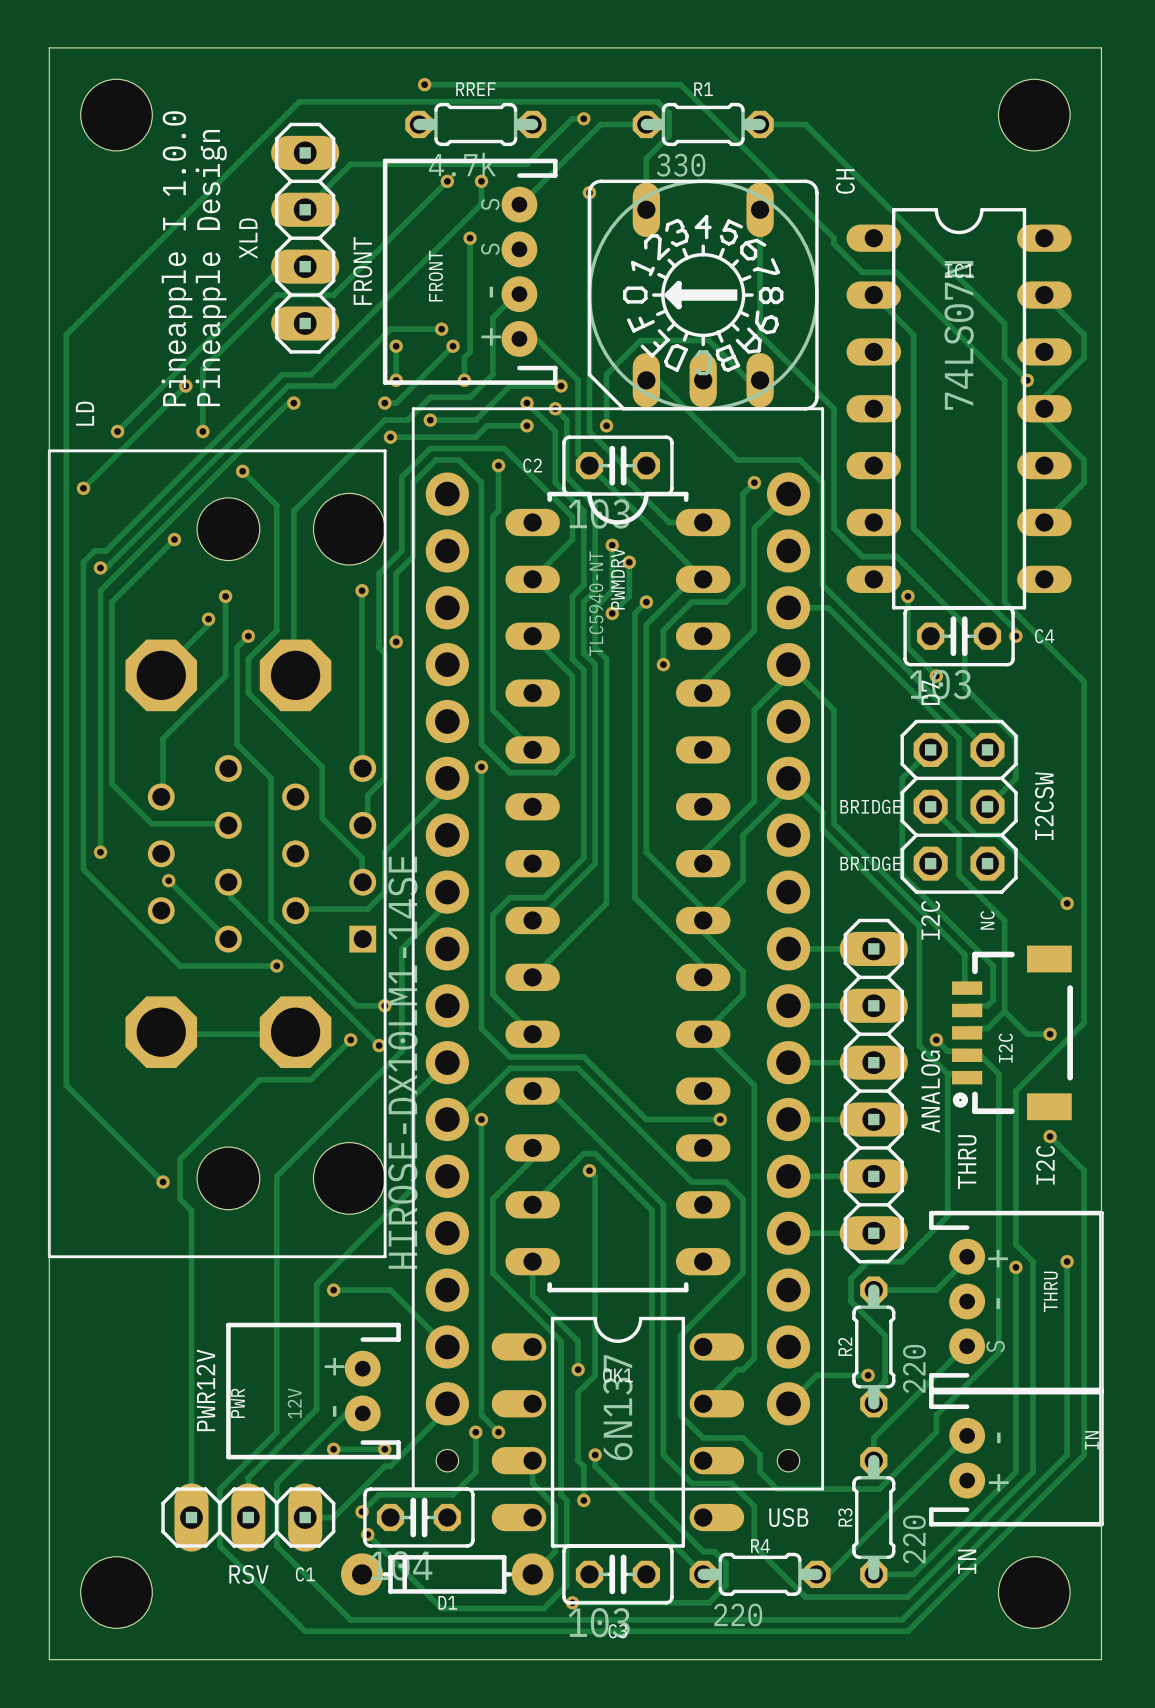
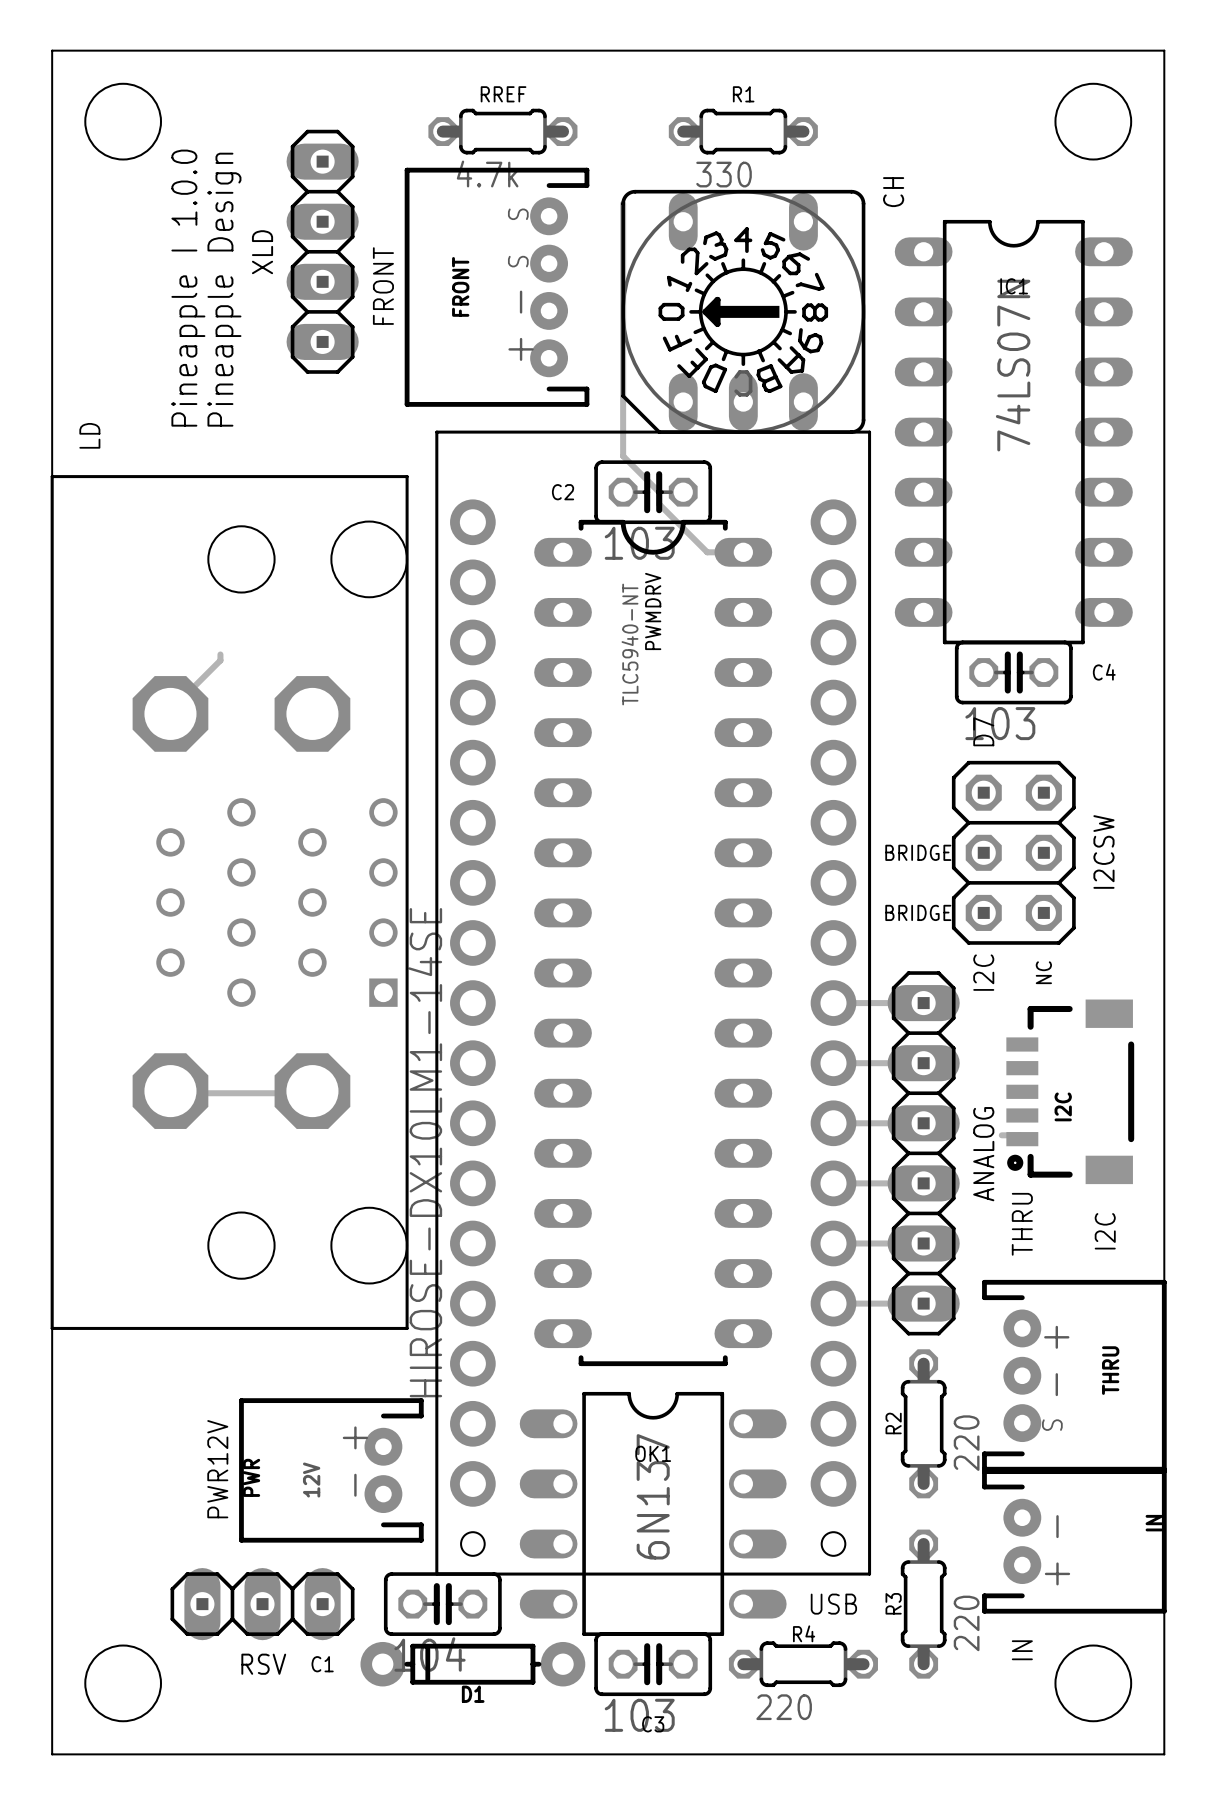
track: (424, 84) (680, 84) (833, 238) (833, 243) (862, 272) (896, 272) (1004, 380) (1004, 602) (1084, 681) (1084, 1022) (1015, 1091) (1015, 1244) (1033, 1261) (1033, 1472) (907, 1597) (805, 1597) (754, 1545) (754, 1506) (731, 1483) (691, 1483) (663, 1454) (663, 1204) (549, 1091) (532, 1091) -> none
via: (424, 84) -> none
track: (583, 118) (572, 118) (526, 164) (350, 164) (305, 209) -> none
via: (583, 118) -> none
track: (646, 124) (600, 124) (519, 204) -> none
track: (760, 124) (805, 124) (1004, 323) (1004, 357) (1027, 380) -> none
track: (447, 181) (333, 295) (276, 295) (202, 368) (202, 431) -> none
via: (447, 181) -> none
track: (481, 181) (481, 204) (310, 374) (282, 374) (106, 550) (94, 550) (83, 562) (83, 869) (180, 965) (276, 965) -> none
via: (481, 181) -> none
via: (589, 192) -> none
track: (646, 209) (646, 158) (669, 135) (669, 113) (657, 101) (299, 101) (66, 334) (66, 1085) (163, 1182) -> none
track: (760, 209) (760, 334) (833, 408) (833, 528) (862, 556) (896, 556) (964, 624) (964, 687) (1015, 738) (1015, 778) (987, 806) -> none
track: (470, 238) (470, 351) (464, 357) (464, 380) -> none
via: (470, 238) -> none
track: (305, 266) (282, 266) (117, 431) -> none
track: (519, 294) (515, 295) (492, 317) (492, 374) (470, 397) (430, 397) (407, 420) (384, 420) (293, 511) (293, 670) (295, 675) -> none
track: (873, 295) (913, 334) (913, 528) (1015, 630) (1015, 636) -> none
track: (1044, 295) (1084, 334) (1084, 357) (1044, 397) (1044, 420) (1084, 459) (1084, 482) (1044, 522) -> none
track: (441, 329) (390, 329) (333, 386) (288, 386) (106, 567) (100, 567) -> none
via: (441, 329) -> none
track: (519, 338) (538, 340) (578, 380) (578, 454) (703, 579) -> none
track: (396, 346) (396, 380) -> none
via: (396, 346) -> none
track: (453, 346) (396, 403) (384, 403) -> none
via: (453, 346) -> none
via: (396, 380) -> none
via: (464, 380) -> none
track: (646, 380) (657, 380) (737, 459) (799, 459) (822, 482) (822, 585) (987, 749) -> none
track: (760, 380) (748, 380) (708, 340) (640, 340) (606, 374) (606, 425) -> none
via: (1027, 380) -> none
track: (185, 386) (83, 488) -> none
via: (185, 386) -> none
track: (561, 386) (509, 386) (475, 420) (430, 420) -> none
via: (561, 386) -> none
track: (293, 403) (288, 403) (100, 590) (100, 852) -> none
via: (293, 403) -> none
via: (384, 403) -> none
track: (526, 403) (555, 431) (555, 482) (583, 511) (583, 585) (572, 596) (572, 658) (583, 670) (583, 857) (544, 897) (509, 897) (492, 914) (492, 994) (532, 1034) -> none
via: (526, 403) -> none
track: (555, 408) (566, 420) (566, 477) (595, 505) (595, 590) (583, 602) (583, 653) (595, 664) (595, 863) (538, 920) (532, 920) -> none
via: (555, 408) -> none
via: (430, 420) -> none
track: (526, 425) (487, 425) (475, 437) (390, 437) -> none
via: (526, 425) -> none
via: (606, 425) -> none
via: (117, 431) -> none
via: (202, 431) -> none
via: (390, 437) -> none
track: (498, 465) (498, 511) (492, 516) (492, 710) (532, 749) -> none
via: (498, 465) -> none
track: (242, 471) (276, 505) (276, 630) (248, 658) (248, 693) (322, 766) (322, 818) (362, 857) (362, 882) -> none
via: (242, 471) -> none
track: (754, 482) (743, 494) (743, 585) (725, 602) (691, 602) (663, 630) (663, 664) -> none
via: (754, 482) -> none
via: (83, 488) -> none
track: (788, 494) (754, 528) (754, 630) (703, 681) (703, 693) -> none
track: (174, 539) (111, 602) (111, 784) (151, 823) (228, 825) -> none
via: (174, 539) -> none
track: (612, 545) (612, 590) (595, 607) (595, 647) (606, 658) (606, 903) (532, 977) -> none
via: (612, 545) -> none
track: (629, 562) (629, 596) (612, 613) -> none
via: (629, 562) -> none
via: (100, 567) -> none
track: (697, 573) (646, 624) (646, 852) (708, 914) -> none
track: (532, 579) (572, 539) (572, 516) (504, 448) (430, 448) (401, 477) (401, 550) (379, 573) (379, 647) (384, 653) (384, 778) (367, 795) (367, 823) (362, 825) -> none
track: (362, 590) (362, 768) -> none
via: (362, 590) -> none
track: (225, 596) (225, 676) (163, 738) (163, 795) (161, 796) -> none
via: (225, 596) -> none
track: (907, 596) (907, 647) (936, 676) -> none
via: (907, 596) -> none
track: (646, 602) (634, 613) (634, 897) (703, 965) (703, 977) -> none
via: (646, 602) -> none
track: (788, 607) (828, 607) (959, 738) (959, 818) (976, 835) (998, 835) (1067, 903) -> none
via: (612, 613) -> none
via: (208, 619) -> none
track: (248, 636) (236, 647) (236, 744) (271, 778) (271, 920) (356, 1005) (384, 1005) -> none
via: (248, 636) -> none
track: (532, 636) (572, 676) (572, 755) (555, 772) (509, 772) (481, 744) (481, 482) (458, 459) (435, 459) (413, 482) (413, 556) (396, 573) (396, 641) -> none
via: (1015, 636) -> none
via: (396, 641) -> none
via: (663, 664) -> none
track: (788, 664) (833, 710) (833, 823) (964, 954) (964, 983) (967, 988) -> none
track: (794, 670) (754, 710) (754, 801) (703, 852) (703, 863) -> none
via: (936, 676) -> none
track: (930, 749) (902, 778) (902, 875) (993, 965) (993, 1000) (987, 1005) (970, 1005) (967, 1010) -> none
track: (481, 766) (481, 1028) (509, 1056) (583, 1056) (646, 1119) (720, 1119) -> none
via: (481, 766) -> none
track: (447, 778) (447, 789) (384, 852) (384, 892) (367, 909) (295, 910) -> none
track: (788, 778) (822, 812) (822, 829) (919, 926) (919, 1045) (947, 1074) (947, 1216) (902, 1261) (868, 1261) (851, 1278) (851, 1301) (885, 1335) (885, 1381) (873, 1392) (873, 1403) -> none
track: (794, 784) (743, 835) (743, 880) (703, 920) (703, 931) (743, 971) (743, 994) (703, 1034) (754, 1085) (754, 1358) (743, 1369) (737, 1369) (703, 1403) -> none
track: (930, 806) (959, 835) (959, 875) (1004, 920) (1004, 1011) -> none
via: (100, 852) -> none
track: (168, 880) (228, 939) -> none
via: (168, 880) -> none
track: (228, 882) (231, 886) (231, 897) (379, 1045) -> none
track: (447, 892) (447, 903) (401, 948) (401, 1051) (276, 1176) (276, 1432) (219, 1489) (219, 1545) (305, 1631) (907, 1631) (1084, 1454) (1084, 1170) (1050, 1136) -> none
via: (1067, 903) -> none
via: (276, 965) -> none
via: (384, 1005) -> none
track: (1004, 1011) (1027, 1034) (1050, 1034) -> none
track: (1004, 1011) (987, 1028) (970, 1028) (967, 1032) -> none
via: (1050, 1034) -> none
track: (350, 1039) (310, 1079) (259, 1079) (180, 1159) (180, 1199) (191, 1210) (191, 1517) -> none
via: (350, 1039) -> none
track: (936, 1039) (947, 1051) (964, 1051) (970, 1056) (981, 1056) (998, 1074) (998, 1352) (936, 1415) (936, 1432) (879, 1489) (777, 1489) (760, 1472) (760, 1454) (743, 1437) (703, 1437) (680, 1415) (680, 1335) (743, 1273) (743, 1199) (725, 1182) (691, 1182) (578, 1068) (509, 1068) (458, 1119) (447, 1119) -> none
via: (936, 1039) -> none
via: (379, 1045) -> none
track: (447, 1062) (413, 1096) (413, 1187) (316, 1284) (316, 1409) (248, 1477) (248, 1517) -> none
track: (481, 1119) (481, 1415) (498, 1432) -> none
via: (481, 1119) -> none
via: (720, 1119) -> none
via: (1050, 1136) -> none
track: (532, 1147) (532, 1159) (492, 1199) (492, 1273) (561, 1341) (561, 1494) (566, 1500) (566, 1585) (544, 1608) (441, 1608) (367, 1534) -> none
track: (589, 1170) (595, 1176) (595, 1375) (578, 1392) (578, 1460) (583, 1466) (583, 1500) -> none
via: (589, 1170) -> none
via: (163, 1182) -> none
track: (532, 1204) (583, 1153) (595, 1153) (652, 1210) (652, 1500) (703, 1551) (714, 1551) (725, 1563) (725, 1585) (708, 1602) (572, 1602) -> none
track: (967, 1256) (964, 1261) (936, 1290) (873, 1290) -> none
track: (532, 1261) (532, 1295) (578, 1341) (578, 1369) -> none
track: (1067, 1261) (1067, 1454) (902, 1619) (350, 1619) (276, 1545) (276, 1483) (345, 1415) (362, 1415) (362, 1413) -> none
via: (1067, 1261) -> none
track: (1015, 1267) (1015, 1472) (913, 1574) (873, 1574) -> none
via: (1015, 1267) -> none
track: (333, 1290) (390, 1290) (447, 1346) -> none
via: (333, 1290) -> none
track: (967, 1346) (873, 1437) (873, 1460) -> none
via: (578, 1369) -> none
track: (868, 1375) (816, 1375) (788, 1403) -> none
via: (868, 1375) -> none
track: (447, 1403) (447, 1409) (390, 1466) (384, 1466) (333, 1517) (305, 1517) -> none
track: (475, 1432) (475, 1472) (453, 1494) (379, 1494) (362, 1511) -> none
via: (475, 1432) -> none
via: (498, 1432) -> none
track: (967, 1435) (828, 1574) (816, 1574) -> none
track: (333, 1449) (384, 1449) -> none
via: (333, 1449) -> none
via: (384, 1449) -> none
track: (595, 1454) (595, 1466) (703, 1574) -> none
via: (595, 1454) -> none
track: (532, 1460) (532, 1483) (555, 1506) (555, 1551) (532, 1574) -> none
via: (583, 1500) -> none
via: (362, 1511) -> none
via: (367, 1534) -> none
via: (572, 1602) -> none

